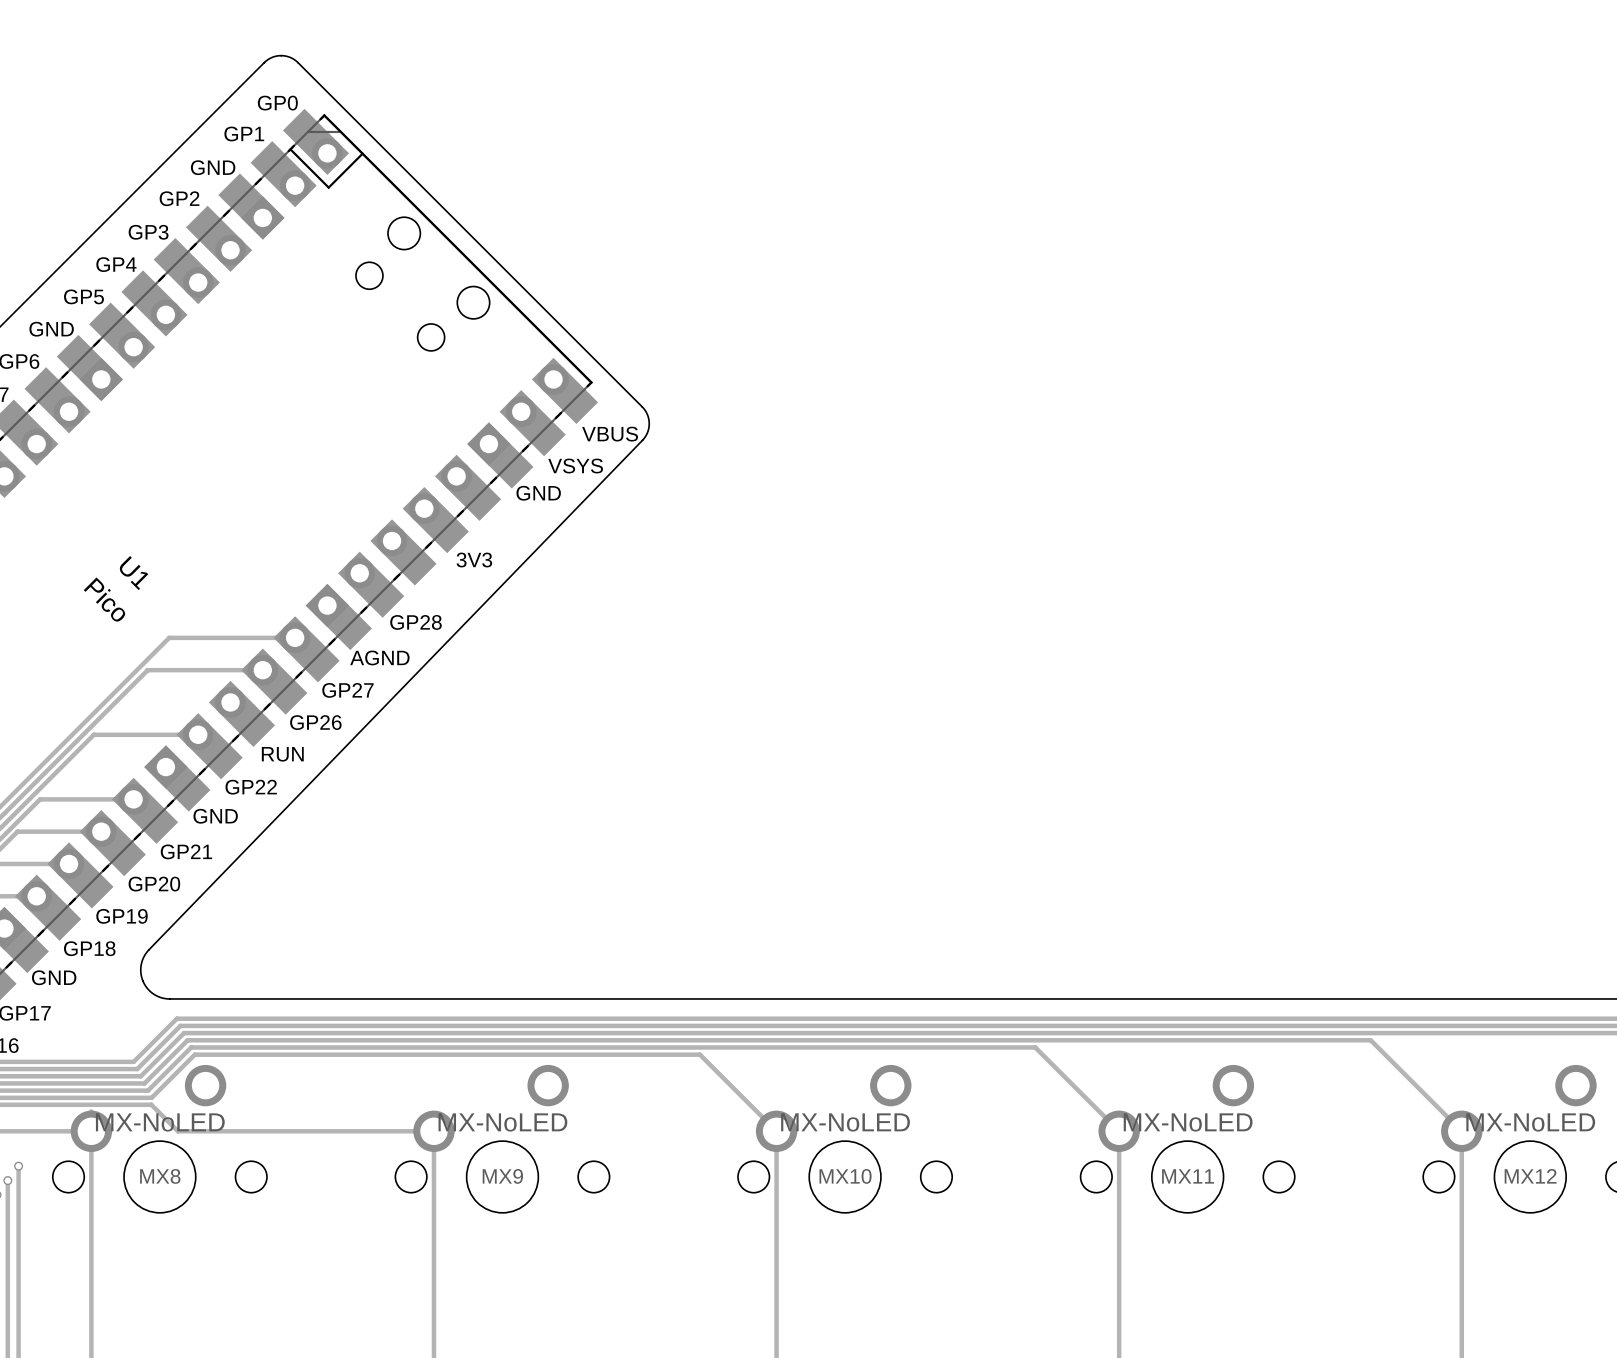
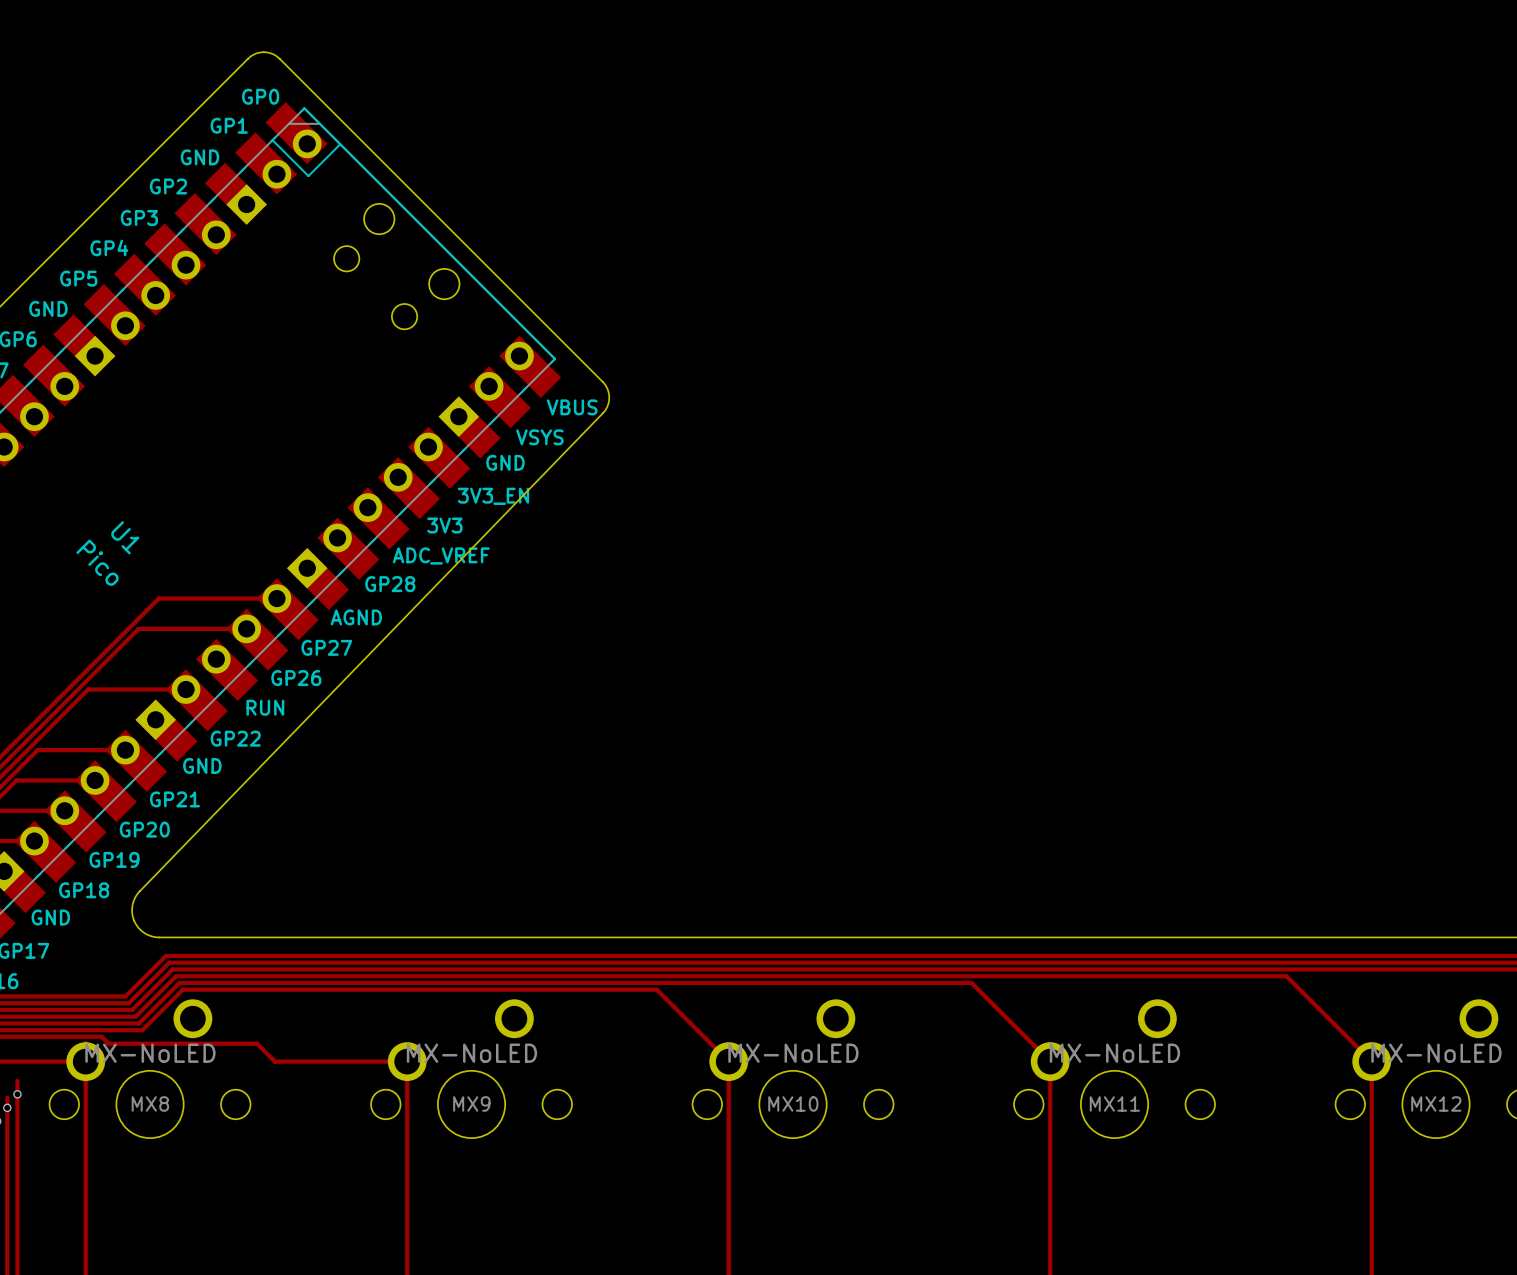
U1 text: none -> 3V3_EN (493, 496)
U1 text: none -> ADC_VREF (441, 555)
track: (108, 1104) (151, 1104) (177, 1131) (293, 1131) -> (101, 1036) (108, 1043) (257, 1043) (274, 1061)
track: none -> (17, 1080) (17, 1094)
track: none -> (7, 1097) (7, 1107)

